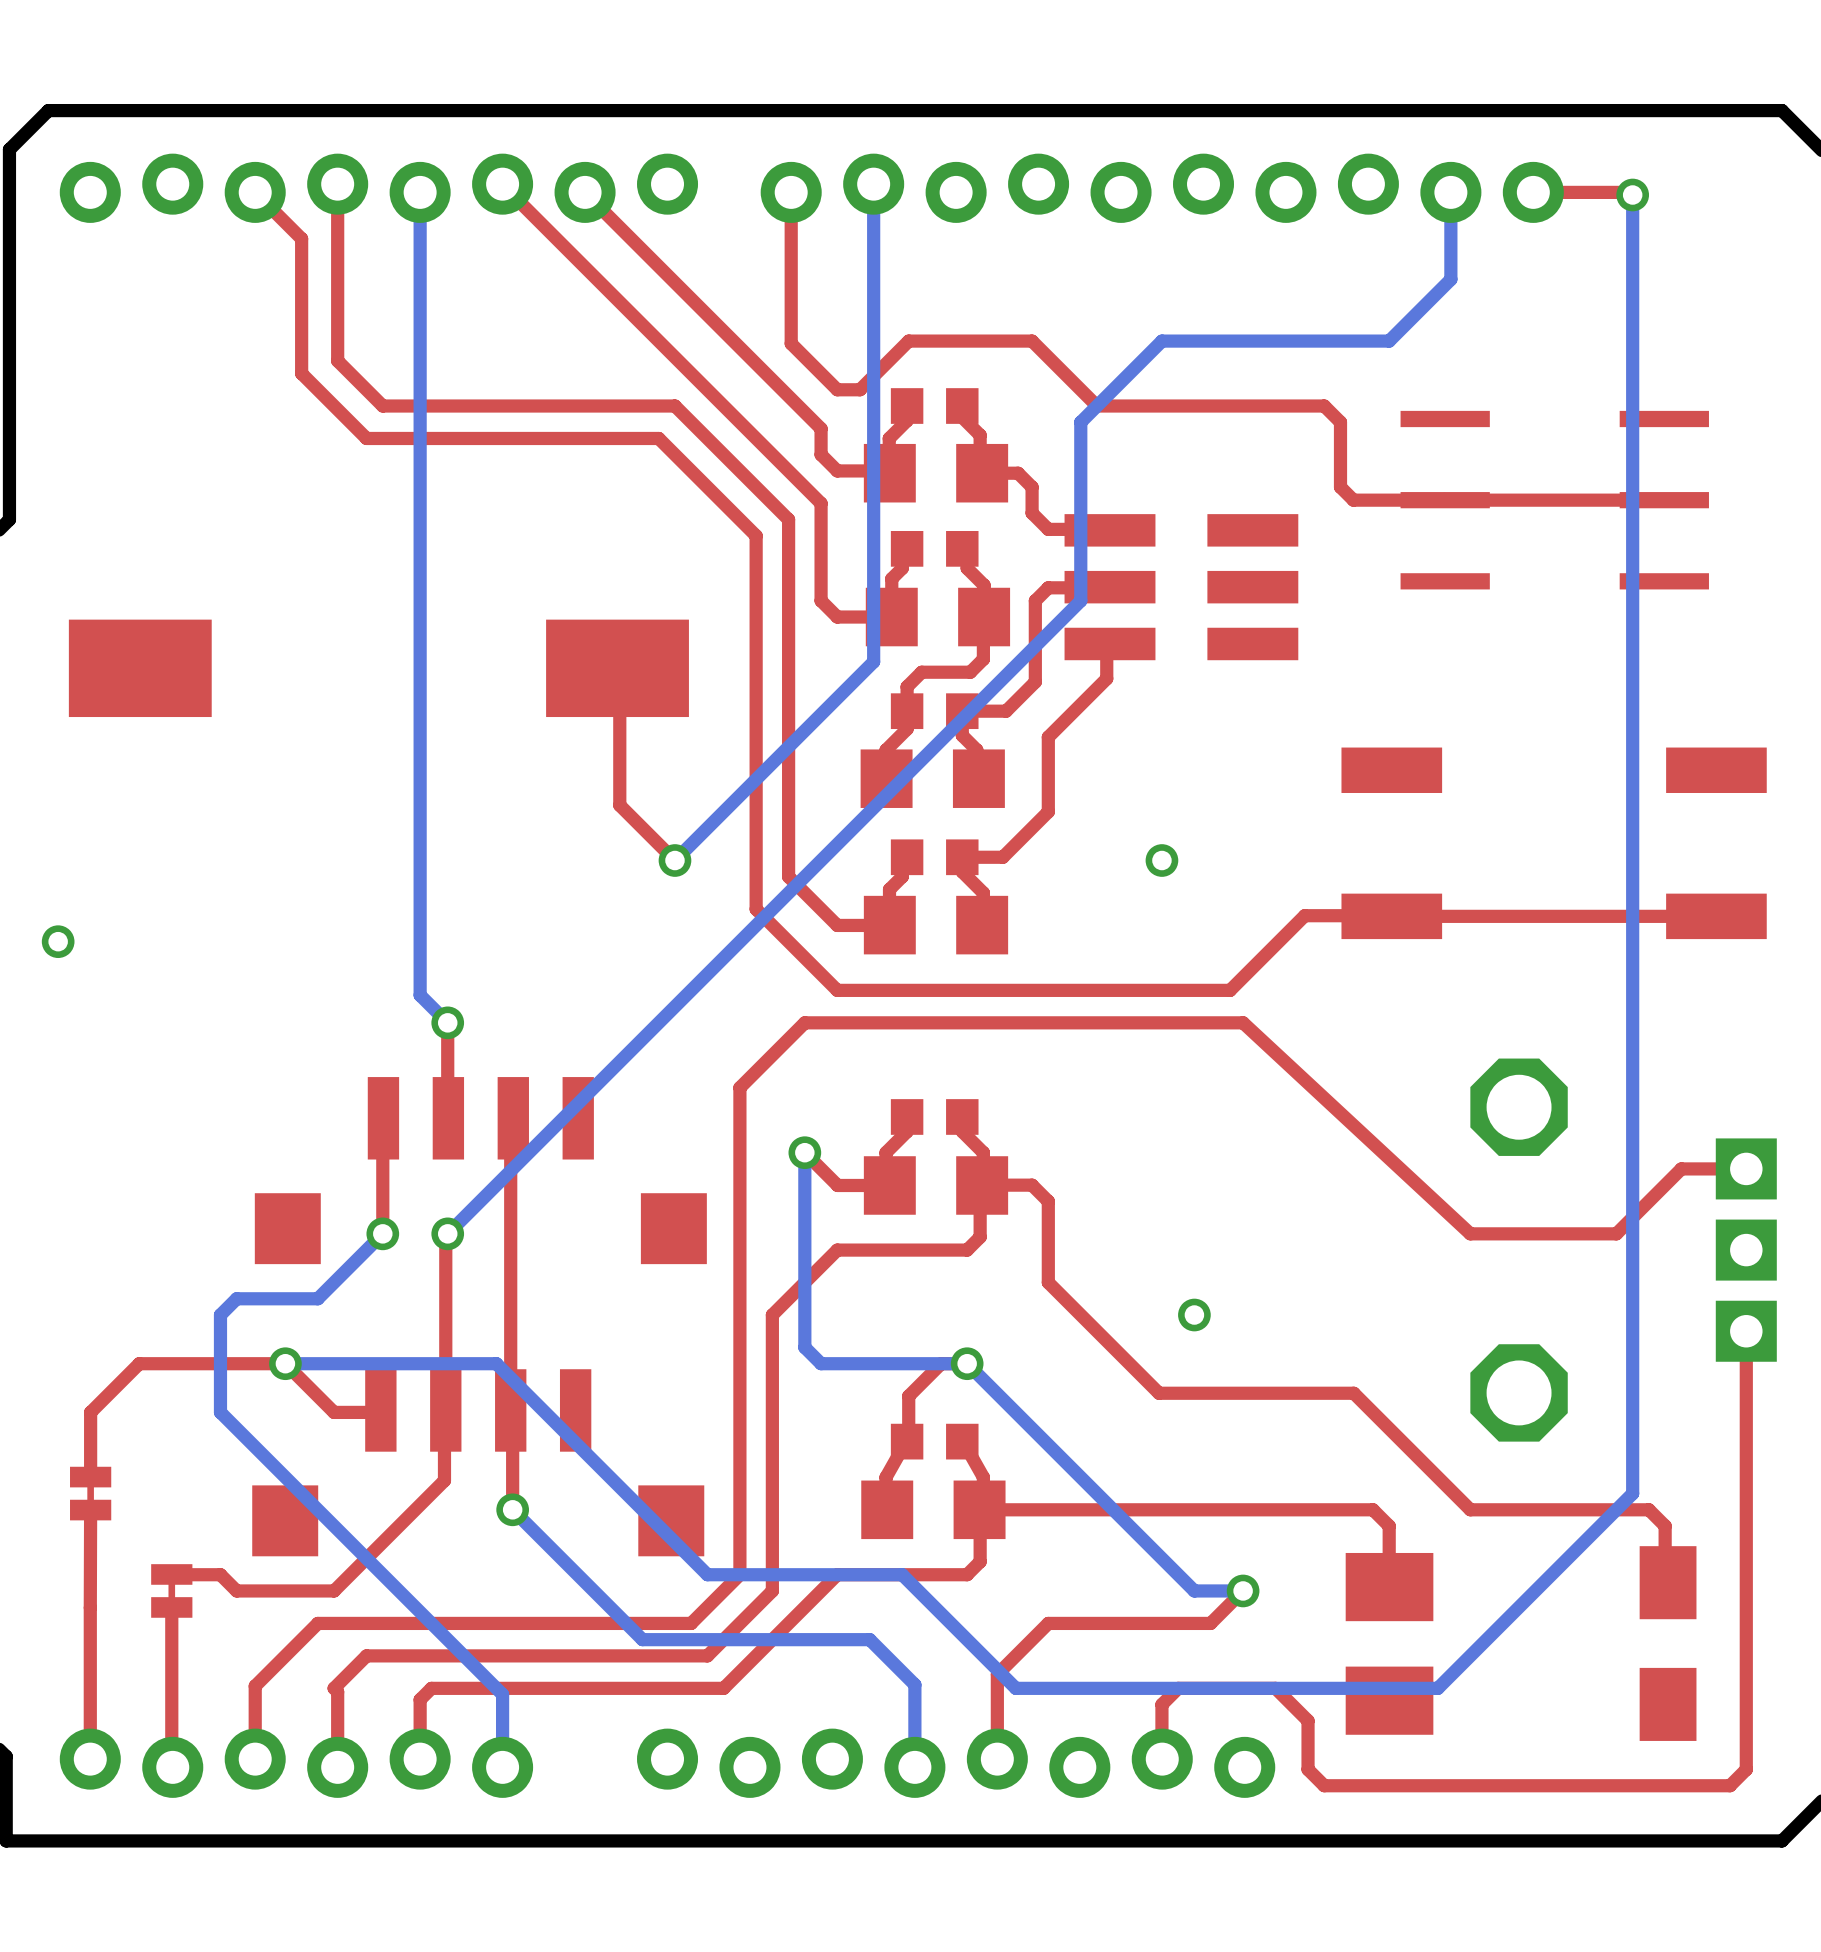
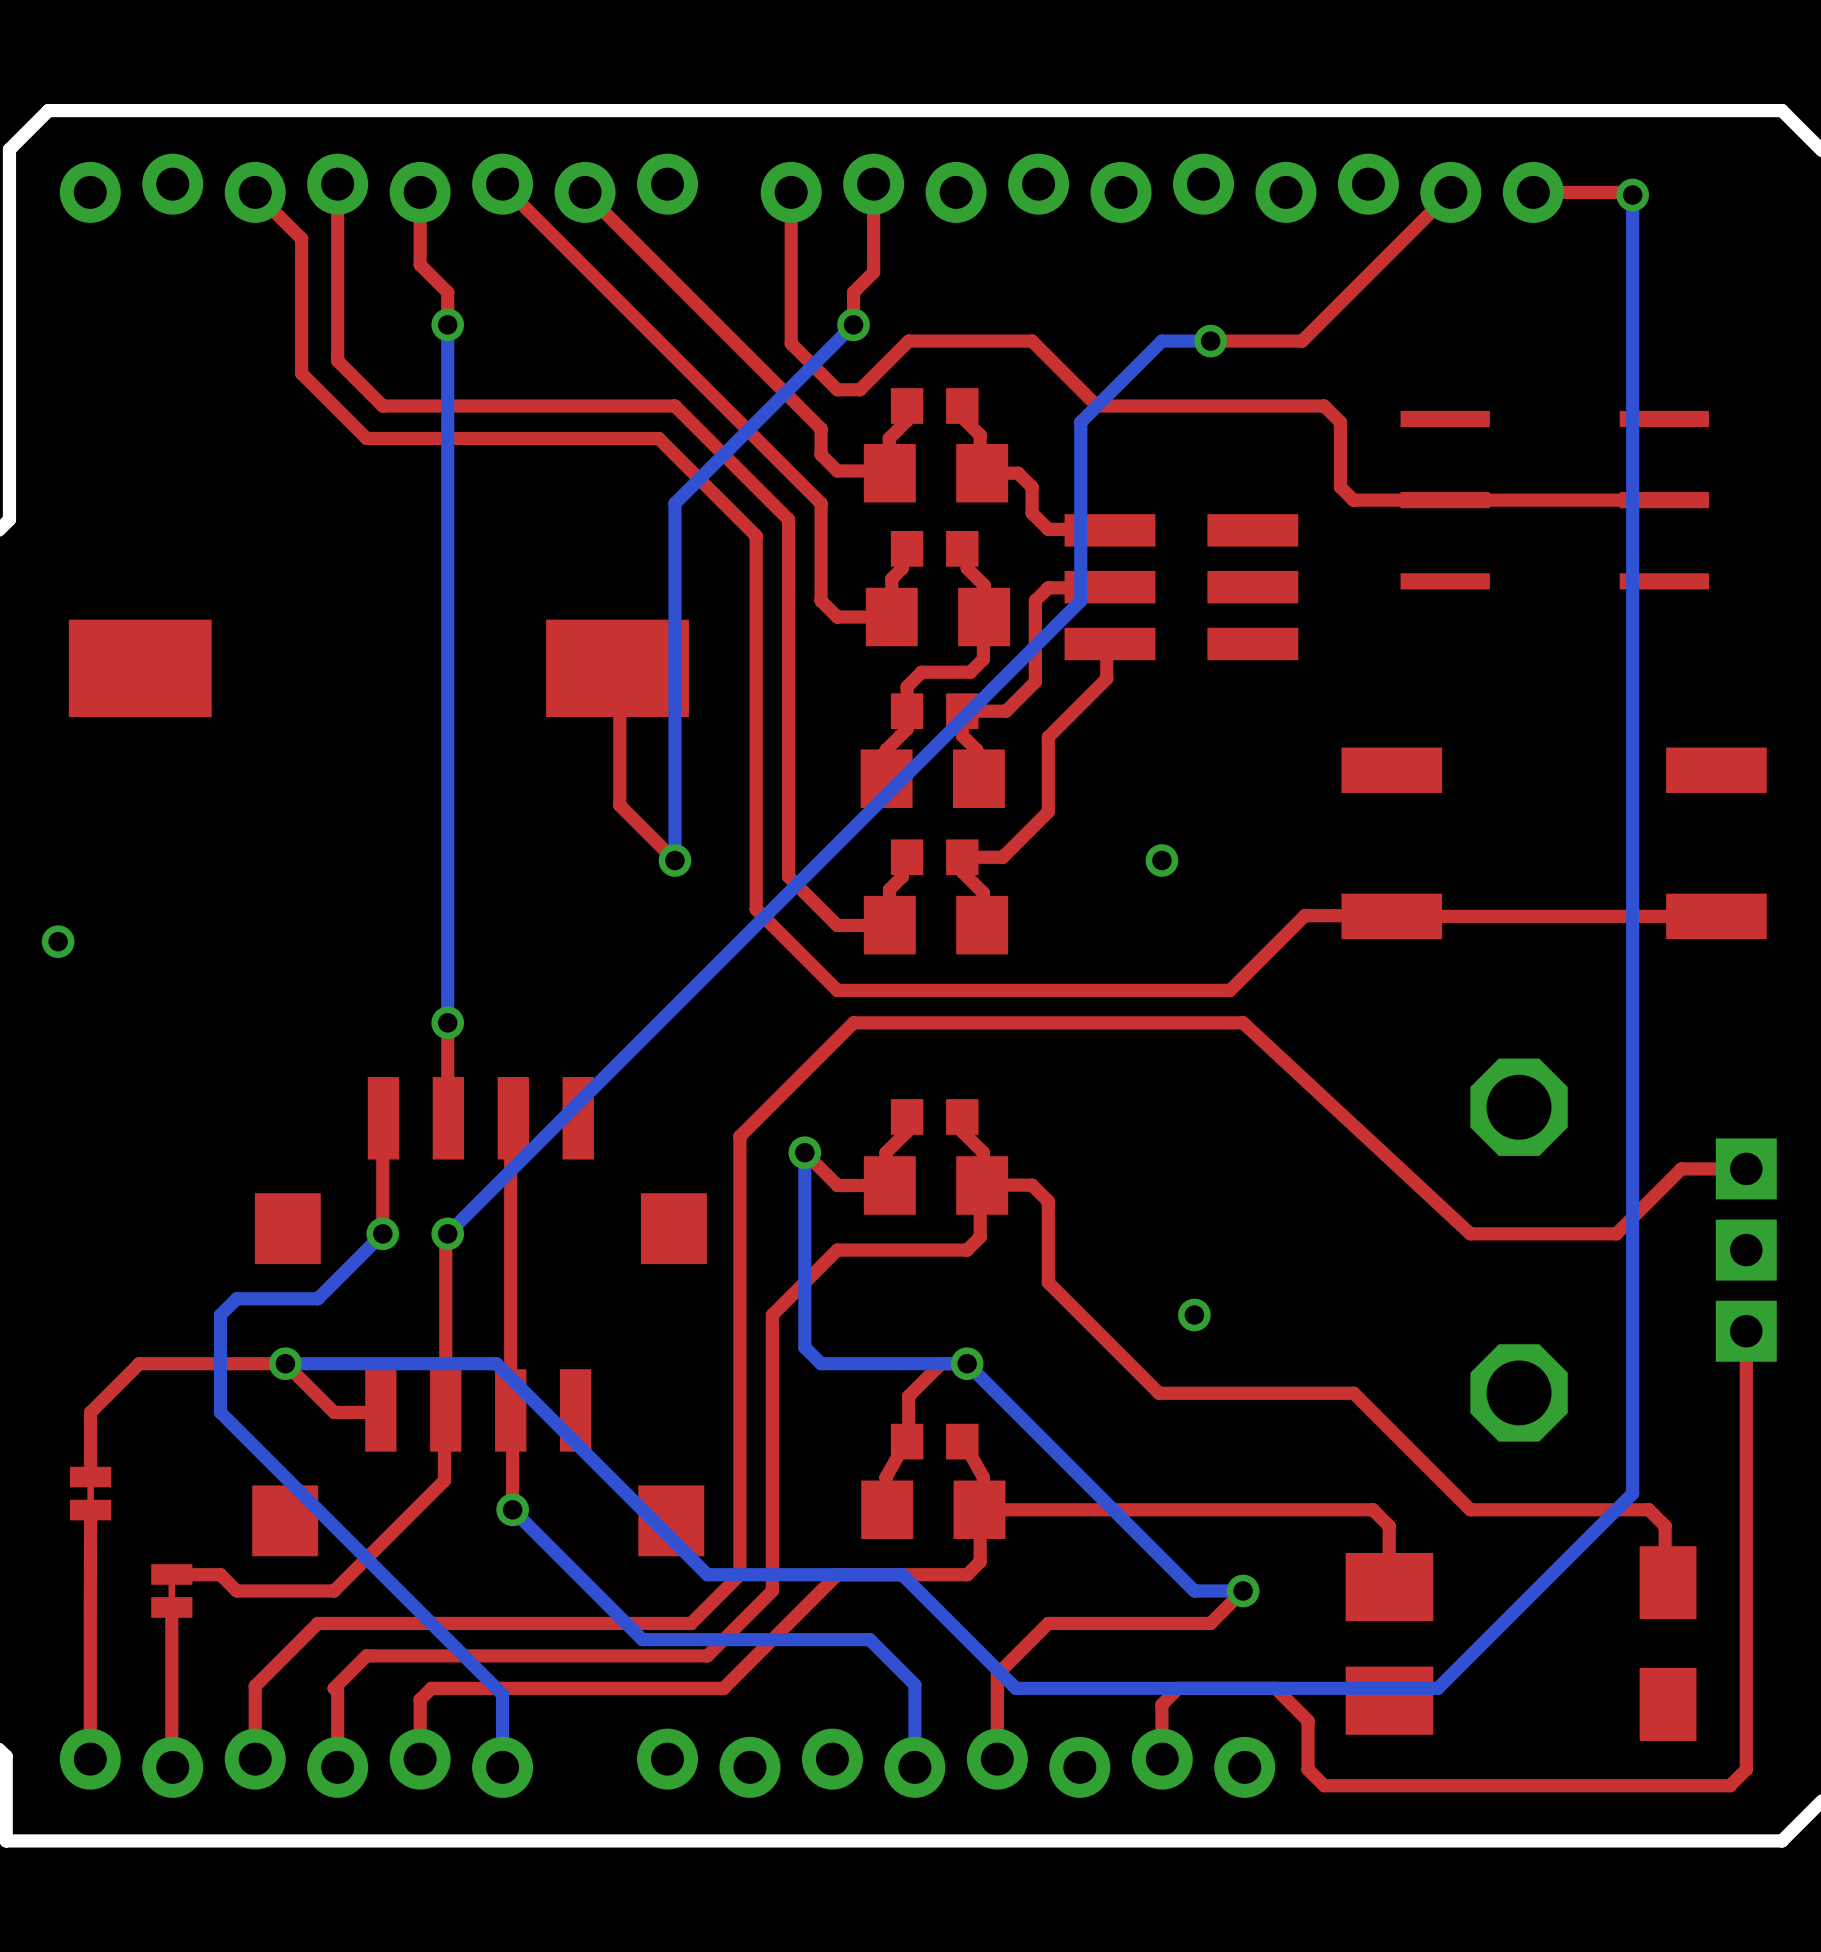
top track: none -> (873, 184) (873, 272) (853, 292) (853, 324)
bottom track: (873, 184) (873, 661) (674, 860) -> (853, 324) (674, 503) (674, 860)
top track: none -> (420, 192) (420, 264) (447, 292) (447, 324)
bottom track: (420, 192) (420, 995) (447, 1022) -> (447, 324) (447, 1022)
top track: none -> (1450, 192) (1302, 341) (1210, 341)
bottom track: (1450, 192) (1450, 279) (1389, 341) (1210, 341) -> none
via: none -> (447, 324)
via: none -> (853, 324)
via: none -> (1210, 341)
top track: (853, 1022) (804, 1022) (739, 1087) (739, 1136) -> (853, 1022) (739, 1136)

